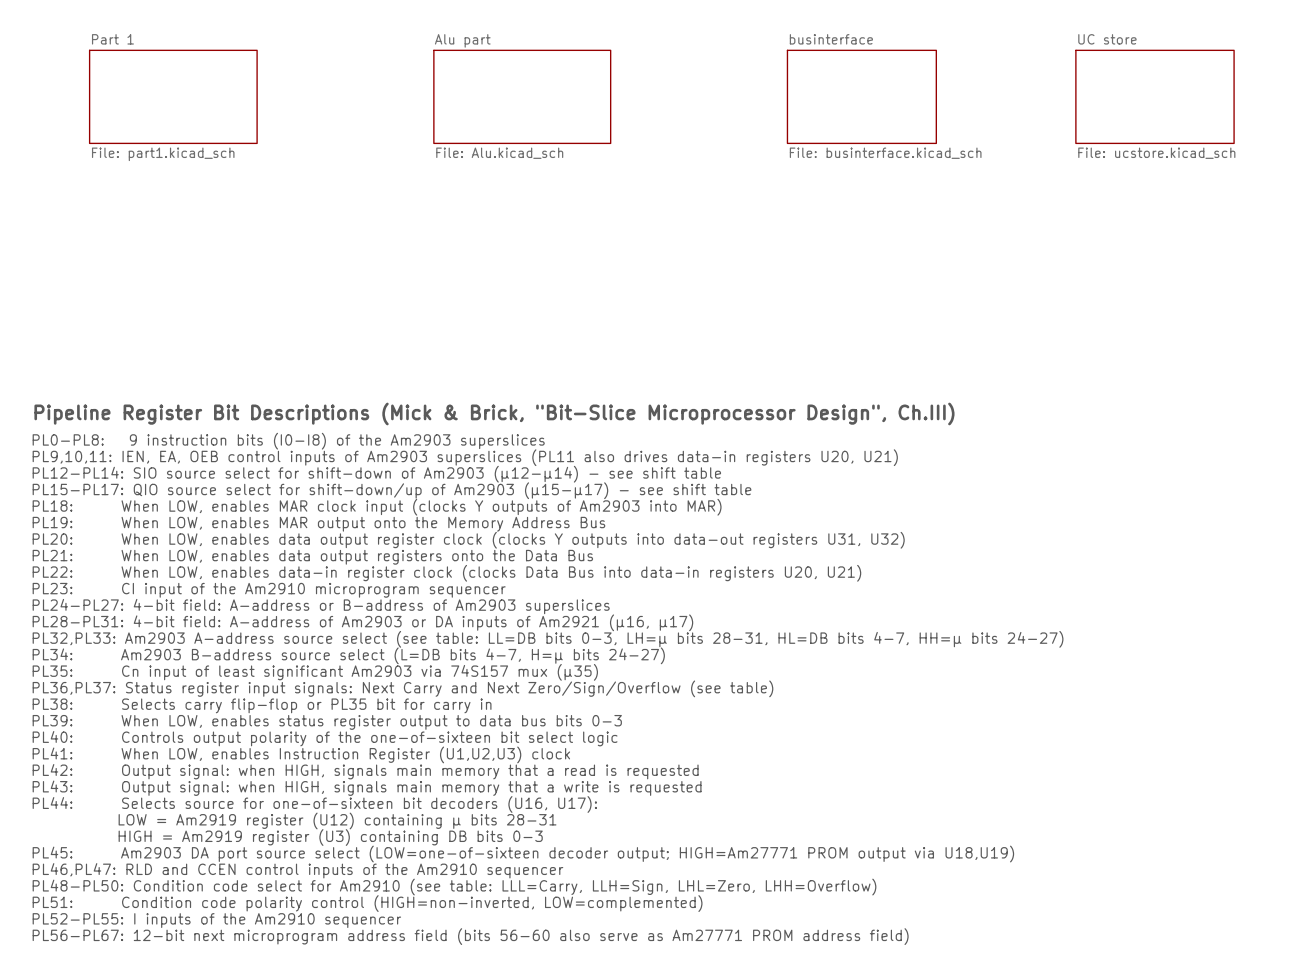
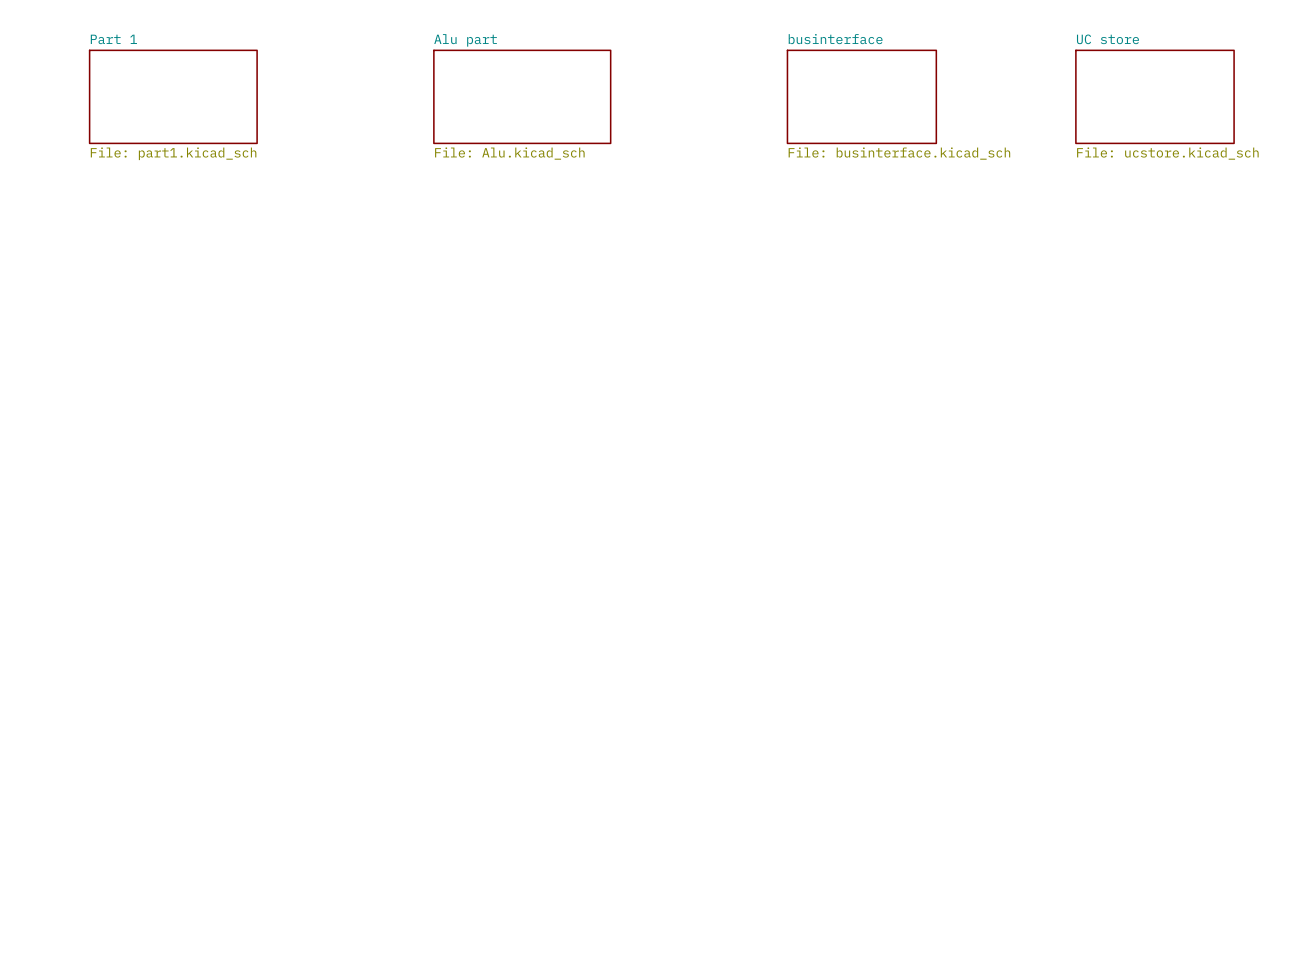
text: Pipeline Register Bit Descriptions (Mick & Brick, "Bit-Slice Microprocessor Design", Ch.III) (494, 413) -> none
text: PL0-PL8: 9 instruction bits (I0-I8) of the Am2903 superslices (288, 441) -> none
text: PL9,10,11: IEN, EA, OEB control inputs of Am2903 superslices (PL11 also drives data-in registers U20, U21) (465, 457) -> none
text: PL12-PL14: SIO source select for shift-down of Am2903 (µ12-µ14) - see shift table (376, 474) -> none
text: PL15-PL17: QIO source select for shift-down/up of Am2903 (µ15-µ17) - see shift table (391, 490) -> none
text: PL18: When LOW, enables MAR clock input (clocks Y outputs of Am2903 into MAR) (377, 507) -> none
text: PL19: When LOW, enables MAR output onto the Memory Address Bus (318, 524) -> none
text: PL20: When LOW, enables data output register clock (clocks Y outputs into data-out registers U31, U32) (468, 540) -> none
text: PL21: When LOW, enables data output registers onto the Data Bus (312, 557) -> none
text: PL22: When LOW, enables data-in register clock (clocks Data Bus into data-in registers U20, U21) (446, 573) -> none
text: PL23: CI input of the Am2910 microprogram sequencer (269, 590) -> none
text: PL24-PL27: 4-bit field: A-address or B-address of Am2903 superslices (321, 606) -> none
text: PL28-PL31: 4-bit field: A-address of Am2903 or DA inputs of Am2921 (µ16, µ17) (362, 622) -> none
text: PL32,PL33: Am2903 A-address source select (see table: LL=DB bits 0-3, LH=µ bits 28-31, HL=DB bits 4-7, HH=µ bits 24-27) (548, 639) -> none
text: PL34: Am2903 B-address source select (L=DB bits 4-7, H=µ bits 24-27) (348, 655) -> none
text: PL35: Cn input of least significant Am2903 via 74S157 mux (µ35) (315, 672) -> none
text: PL36,PL37: Status register input signals: Next Carry and Next Zero/Sign/Overflow (see table) (402, 688) -> none
text: PL38: Selects carry flip-flop or PL35 bit for carry in (262, 705) -> none
text: PL39: When LOW, enables status register output to data bus bits 0-3 (327, 722) -> none
text: PL40: Controls output polarity of the one-of-sixteen bit select logic (325, 738) -> none
text: PL41: When LOW, enables Instruction Register (U1,U2,U3) clock (301, 754) -> none
text: PL42: Output signal: when HIGH, signals main memory that a read is requested (365, 771) -> none
text: PL43: Output signal: when HIGH, signals main memory that a write is requested (367, 788) -> none
text: PL44: Selects source for one-of-sixteen bit decoders (U16, U17): (314, 804) -> none
text: LOW = Am2919 register (U12) containing µ bits 28-31 (337, 820) -> none
text: HIGH = Am2919 register (U3) containing DB bits 0-3 (330, 837) -> none
text: PL45: Am2903 DA port source select (LOW=one-of-sixteen decoder output; HIGH=Am27771 PROM output via U18,U19) (523, 854) -> none
text: PL46,PL47: RLD and CCEN control inputs of the Am2910 sequencer (297, 870) -> none
text: PL48-PL50: Condition code select for Am2910 (see table: LLL=Carry, LLH=Sign, LHL=Zero, LHH=Overflow) (454, 887) -> none
text: PL51: Condition code polarity control (HIGH=non-inverted, LOW=complemented) (367, 903) -> none
text: PL52-PL55: I inputs of the Am2910 sequencer (216, 920) -> none
text: PL56-PL67: 12-bit next microprogram address field (bits 56-60 also serve as Am27771 PROM address field) (470, 936) -> none

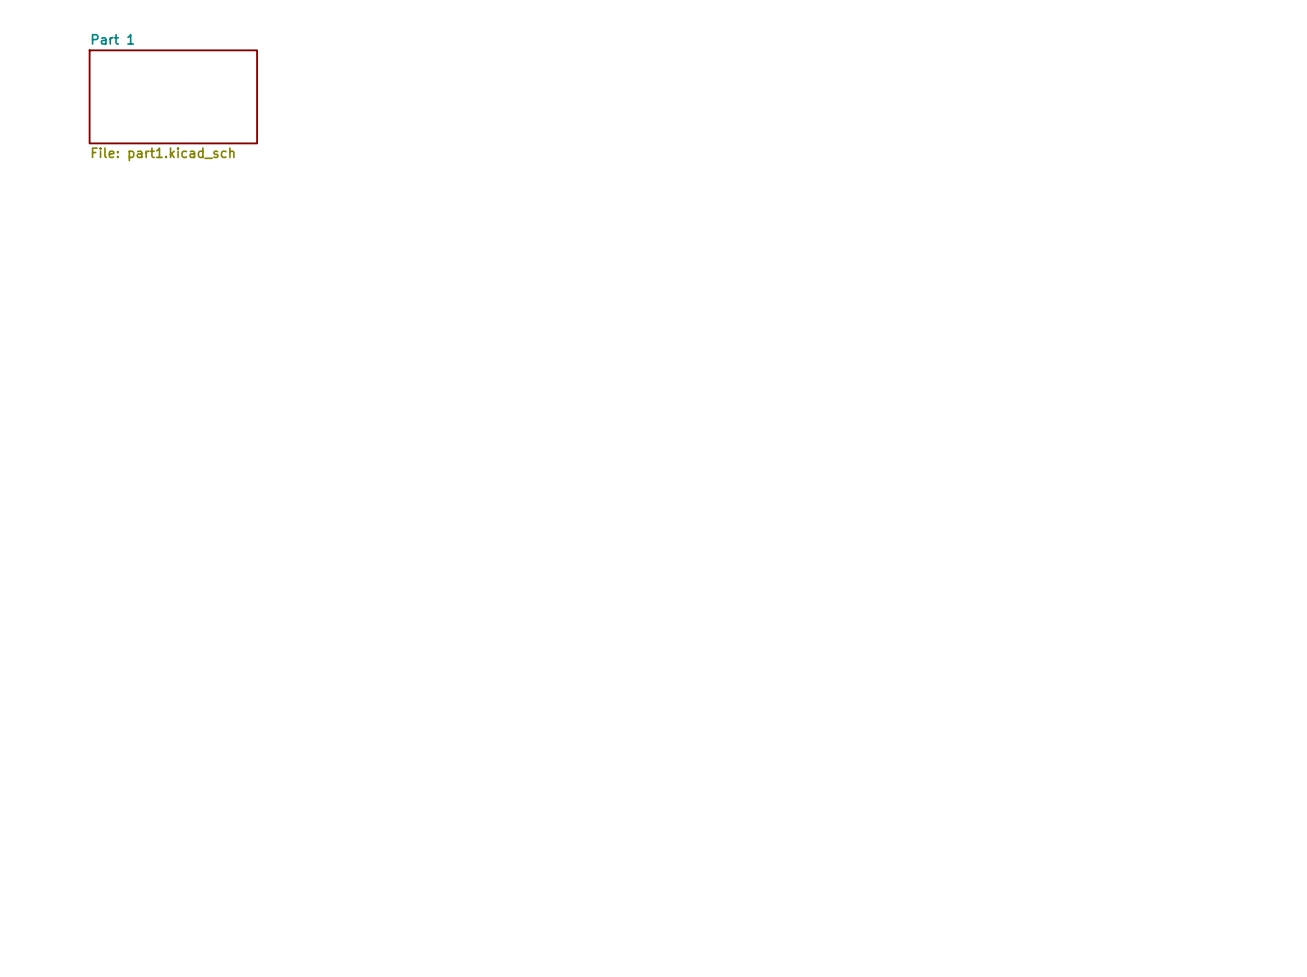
sheet Alu part: File: Alu.kicad_sch (522, 96) -> none
sheet businterface: File: businterface.kicad_sch (861, 96) -> none
sheet UC store: File: ucstore.kicad_sch (1154, 96) -> none

